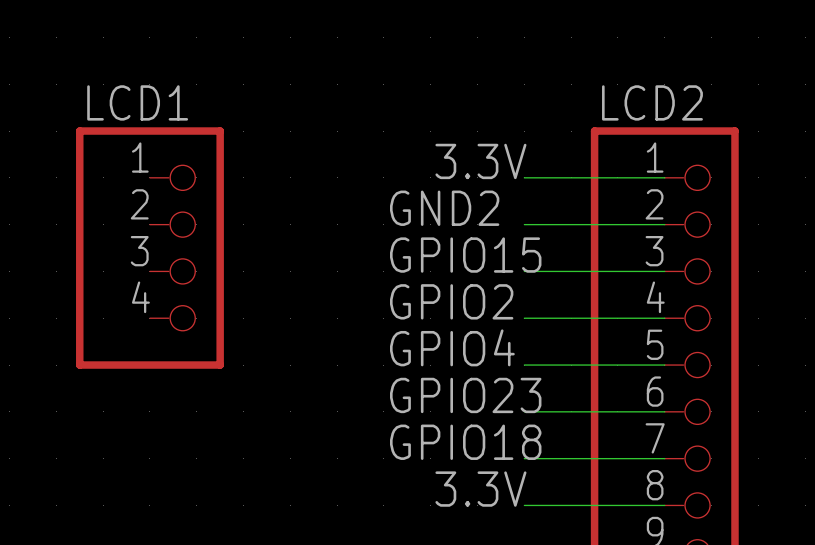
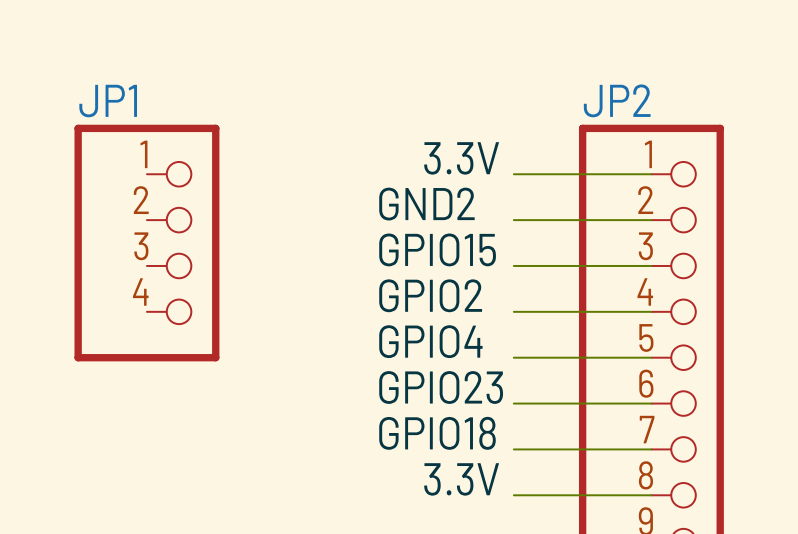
LCD1 name: LCD1 (137, 102) -> JP1 (108, 101)
LCD2 name: LCD2 (652, 102) -> JP2 (617, 100)

